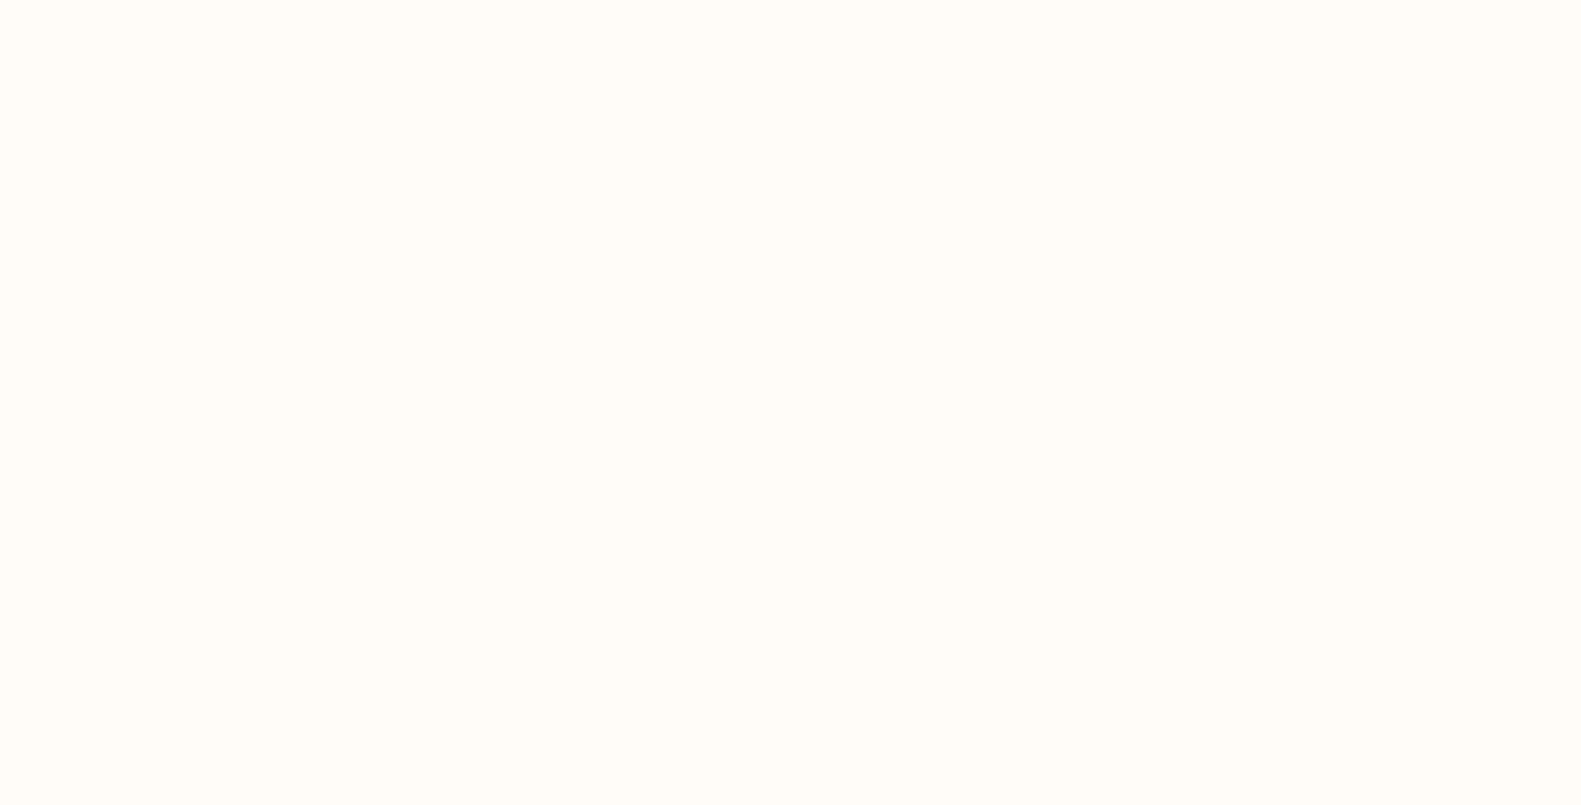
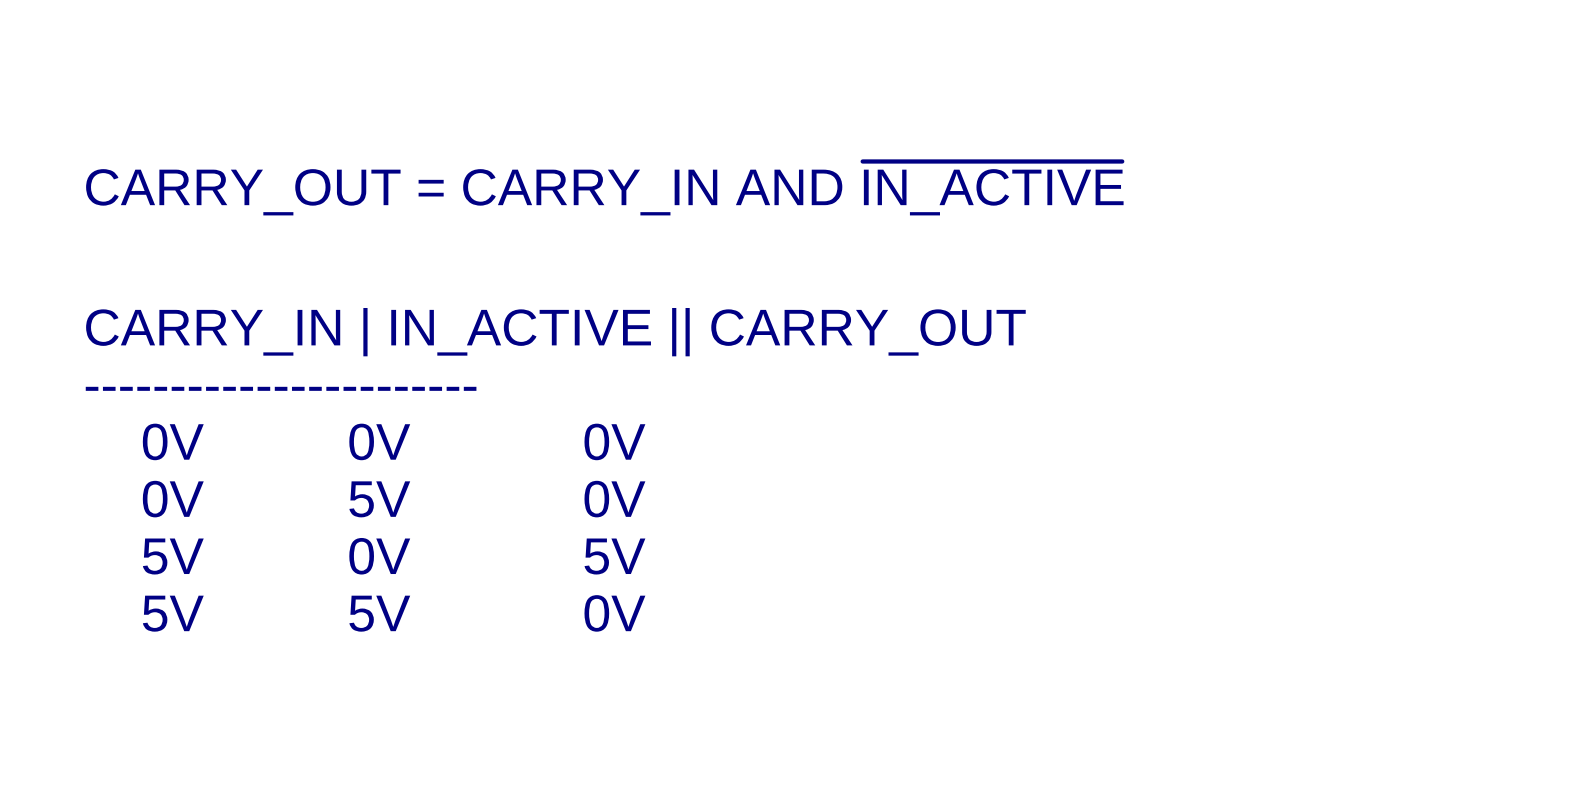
text: none -> CARRY_OUT = CARRY_IN AND ~{IN_ACTIVE} (604, 188)
text: none -> CARRY_IN | IN_ACTIVE || CARRY_OUT (555, 332)
text: none -> ----------------------- (281, 388)
text: none -> 0V 0V 0V (394, 441)
text: none -> 0V 5V 0V (394, 499)
text: none -> 5V 0V 5V (394, 556)
text: none -> 5V 5V 0V (394, 613)

